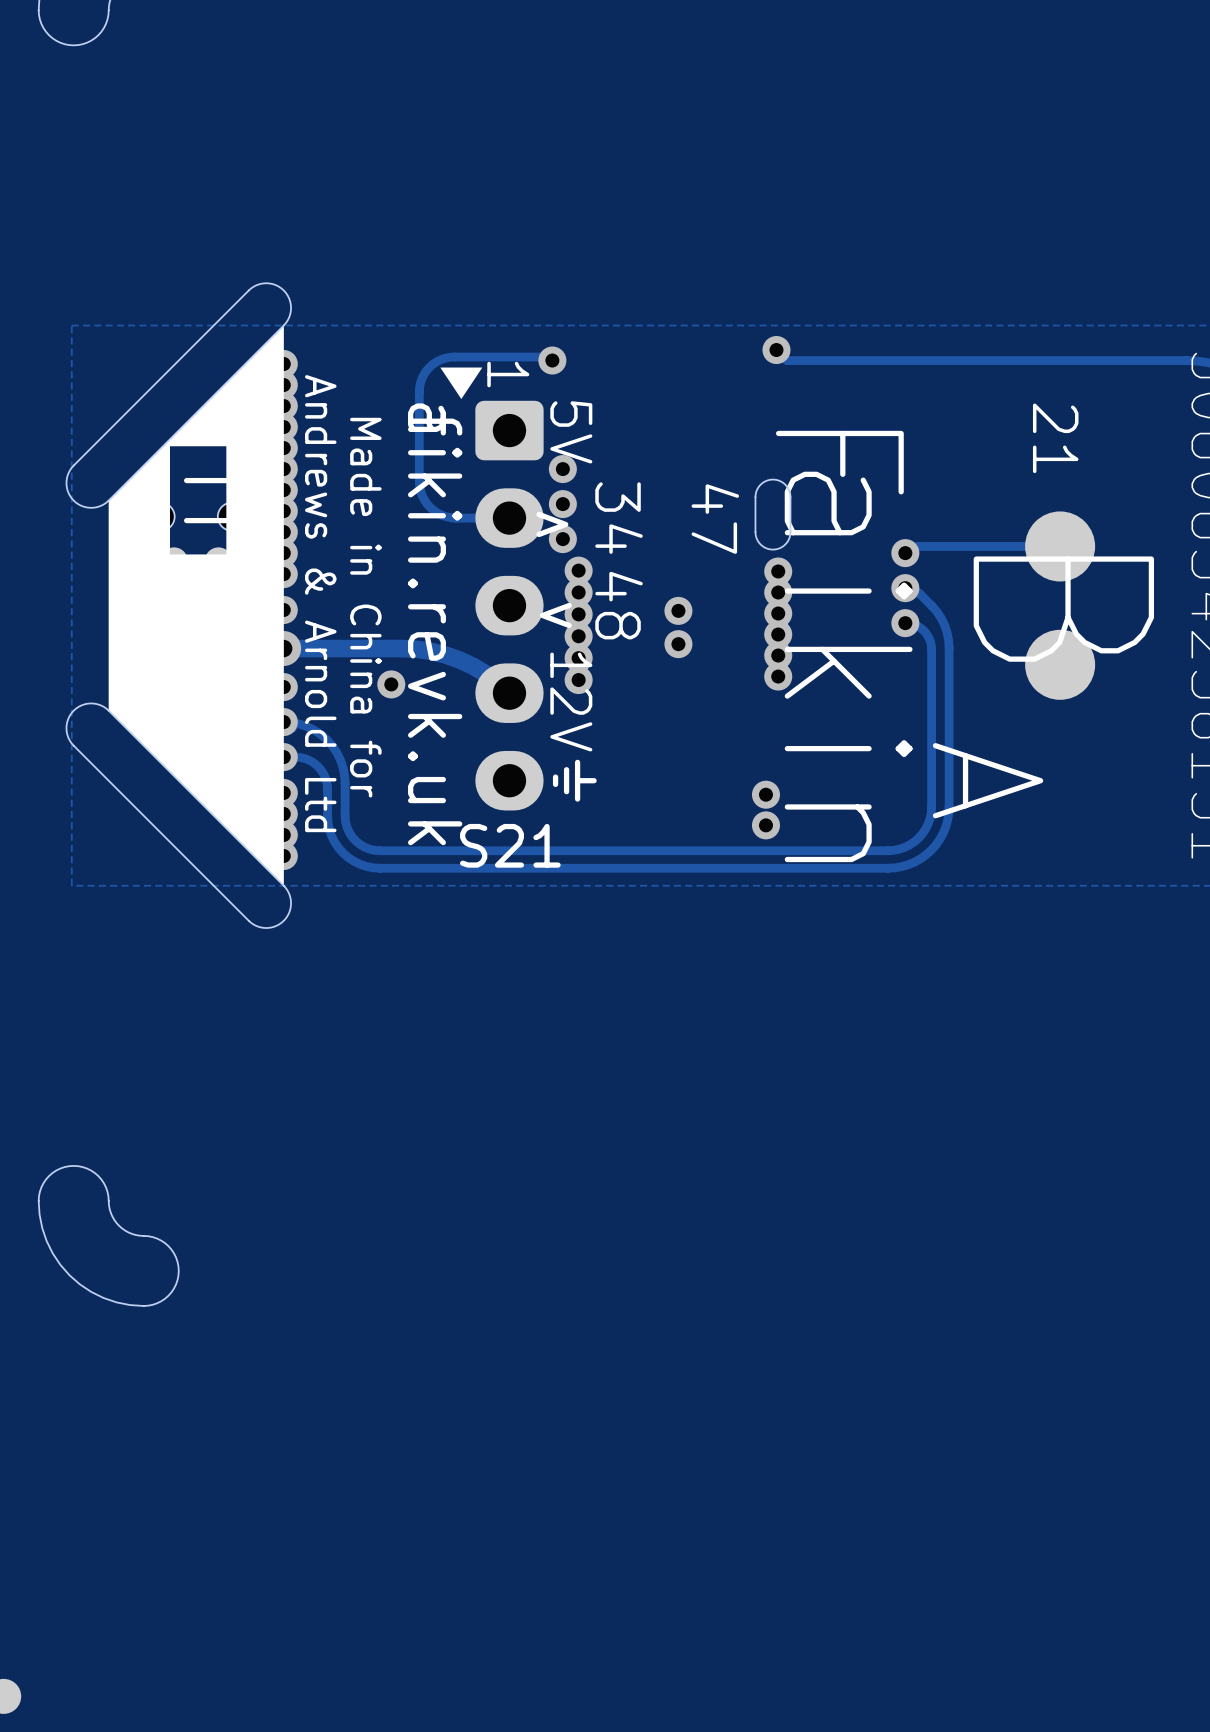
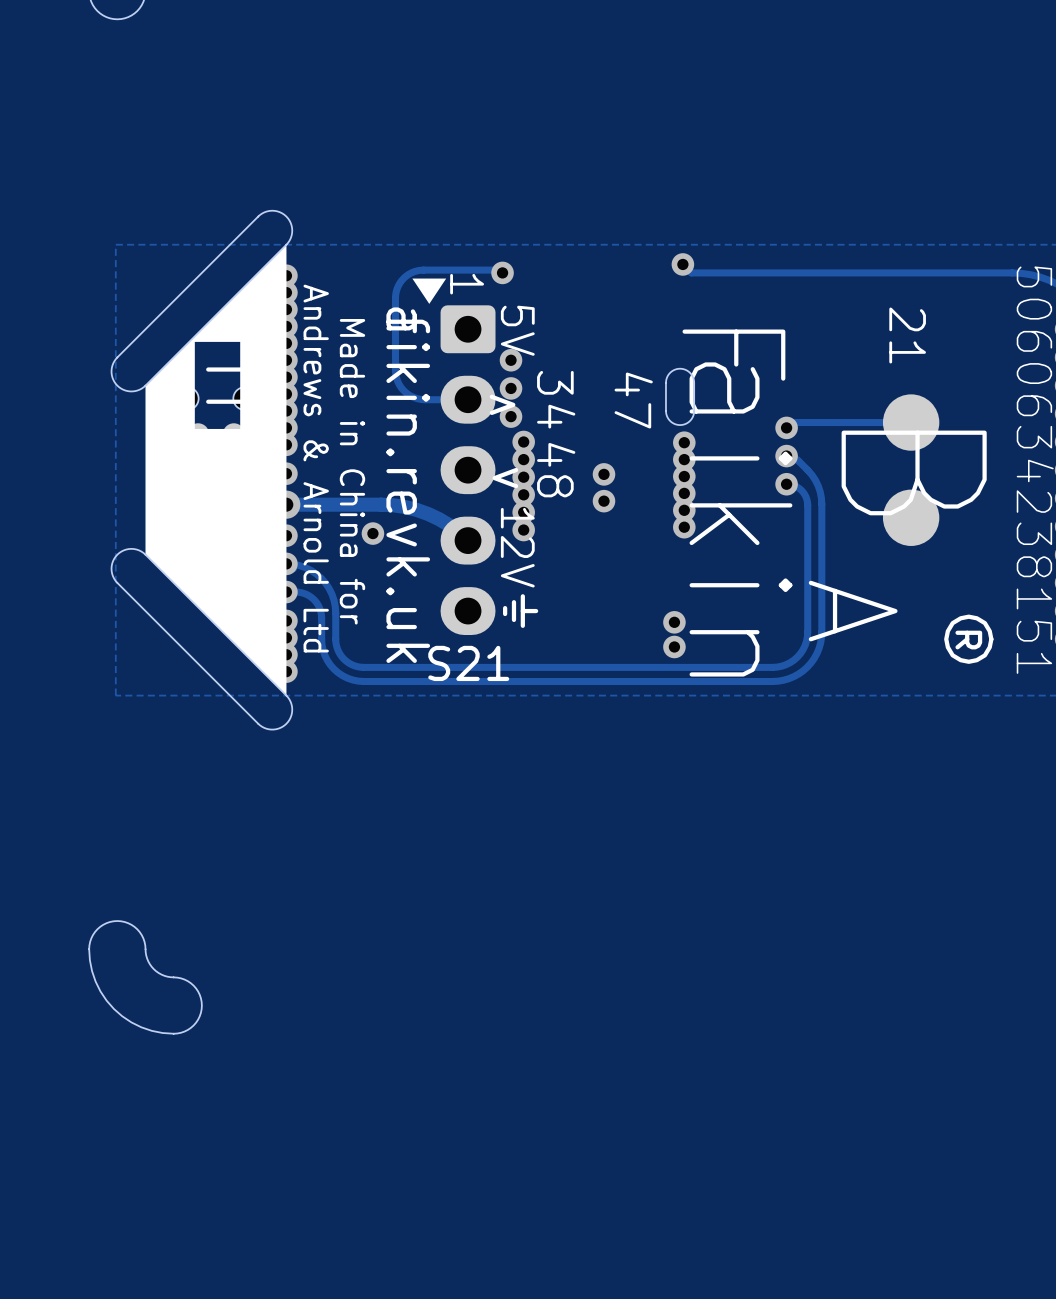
text: none -> ® (968, 639)

